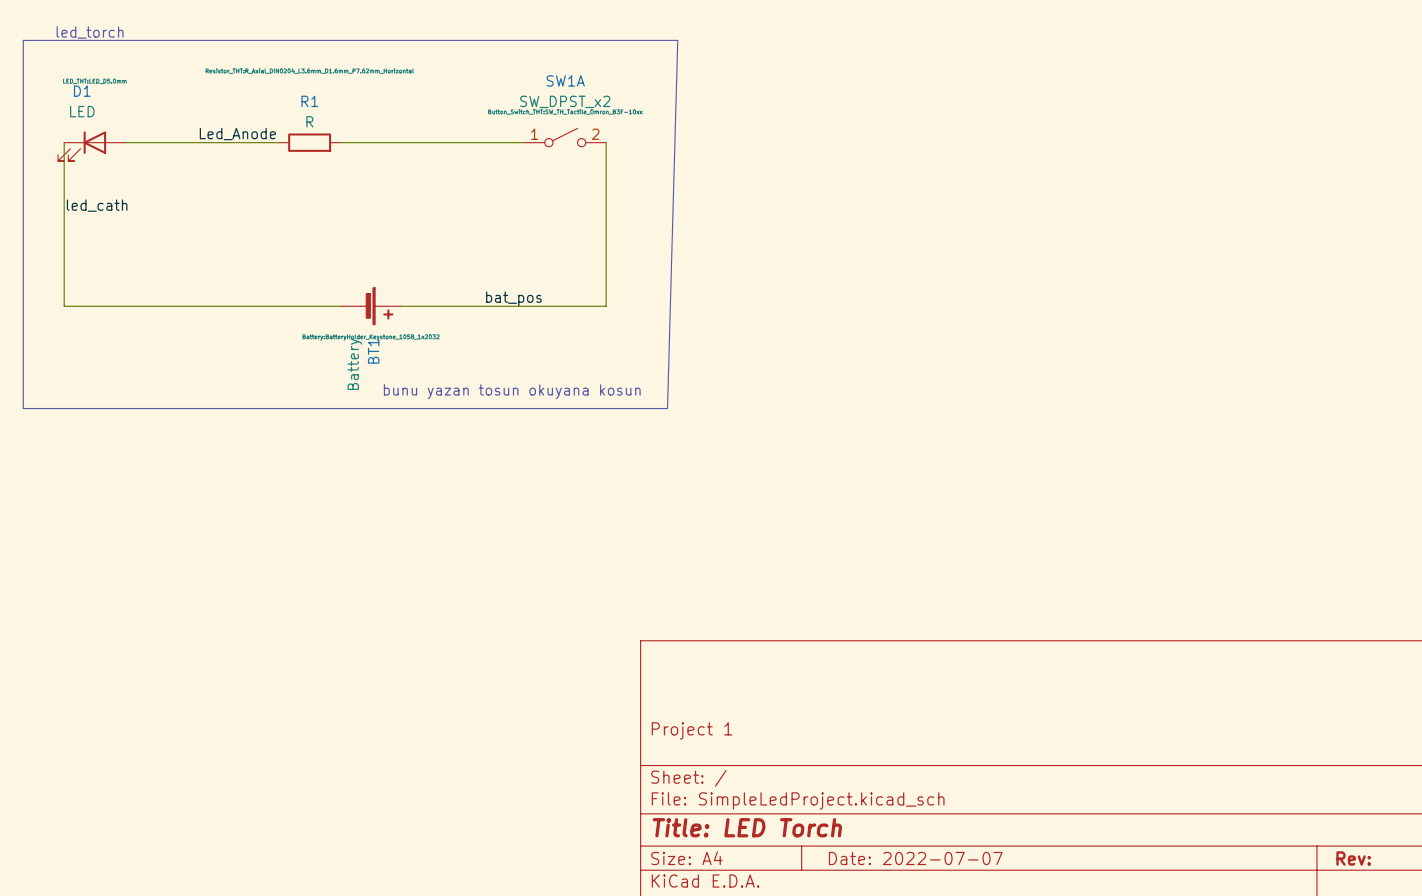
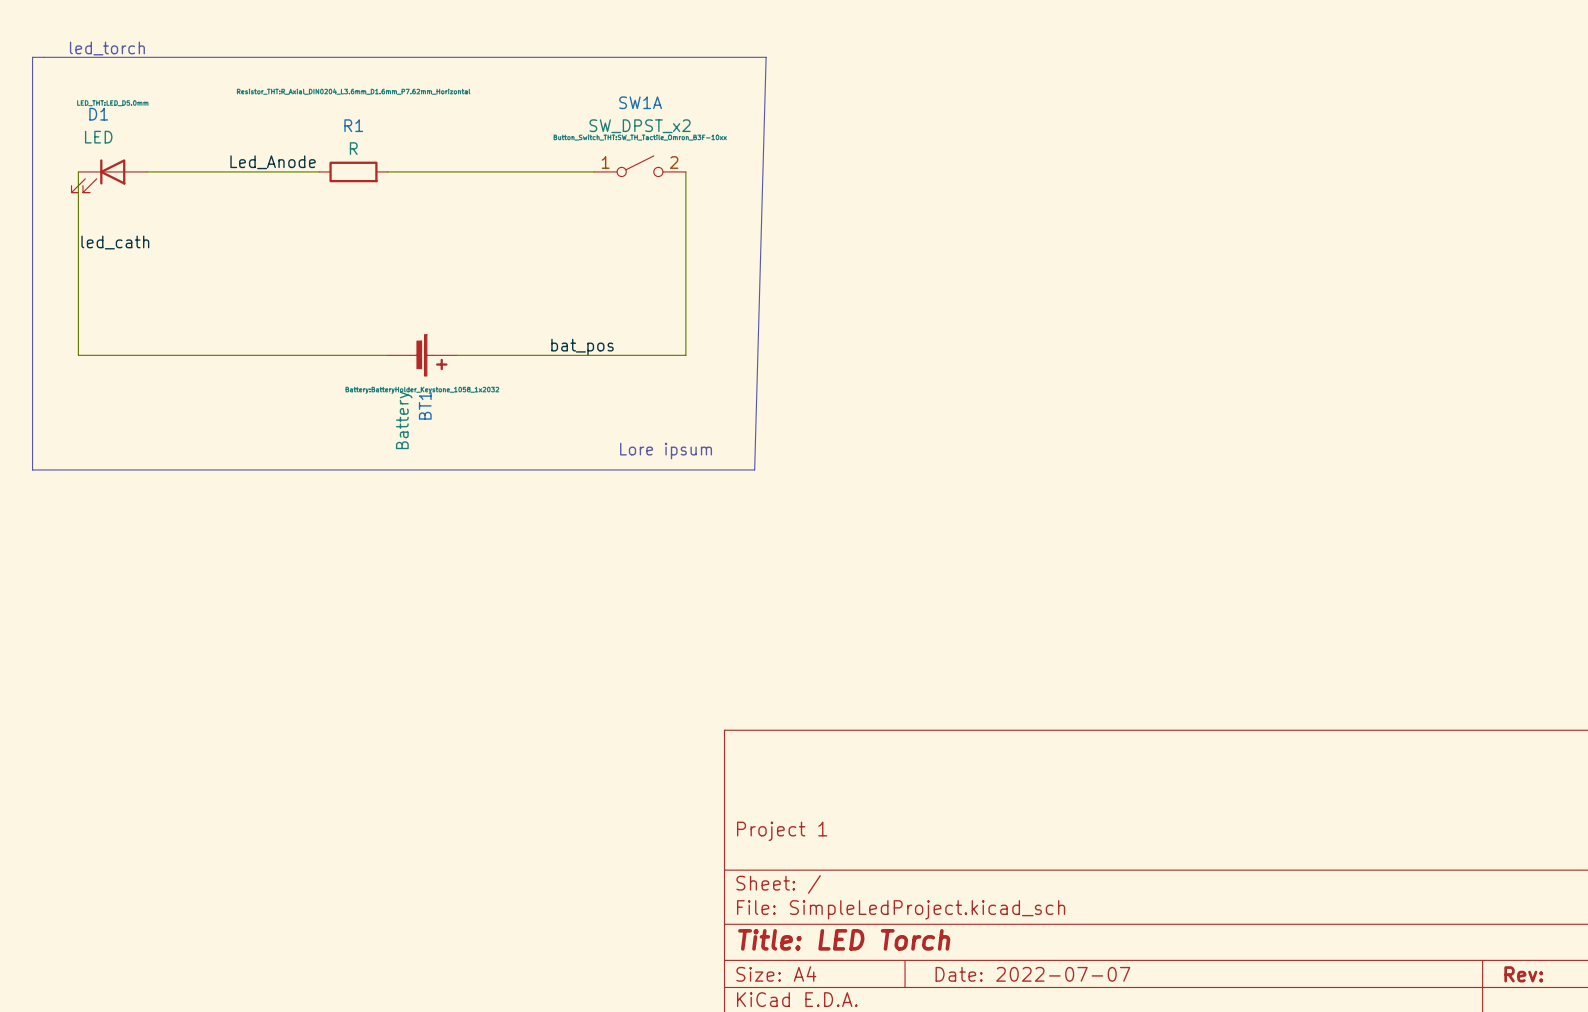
text: bunu yazan tosun okuyana kosun (512, 391) -> none
text: none -> Lore ipsum (666, 451)

